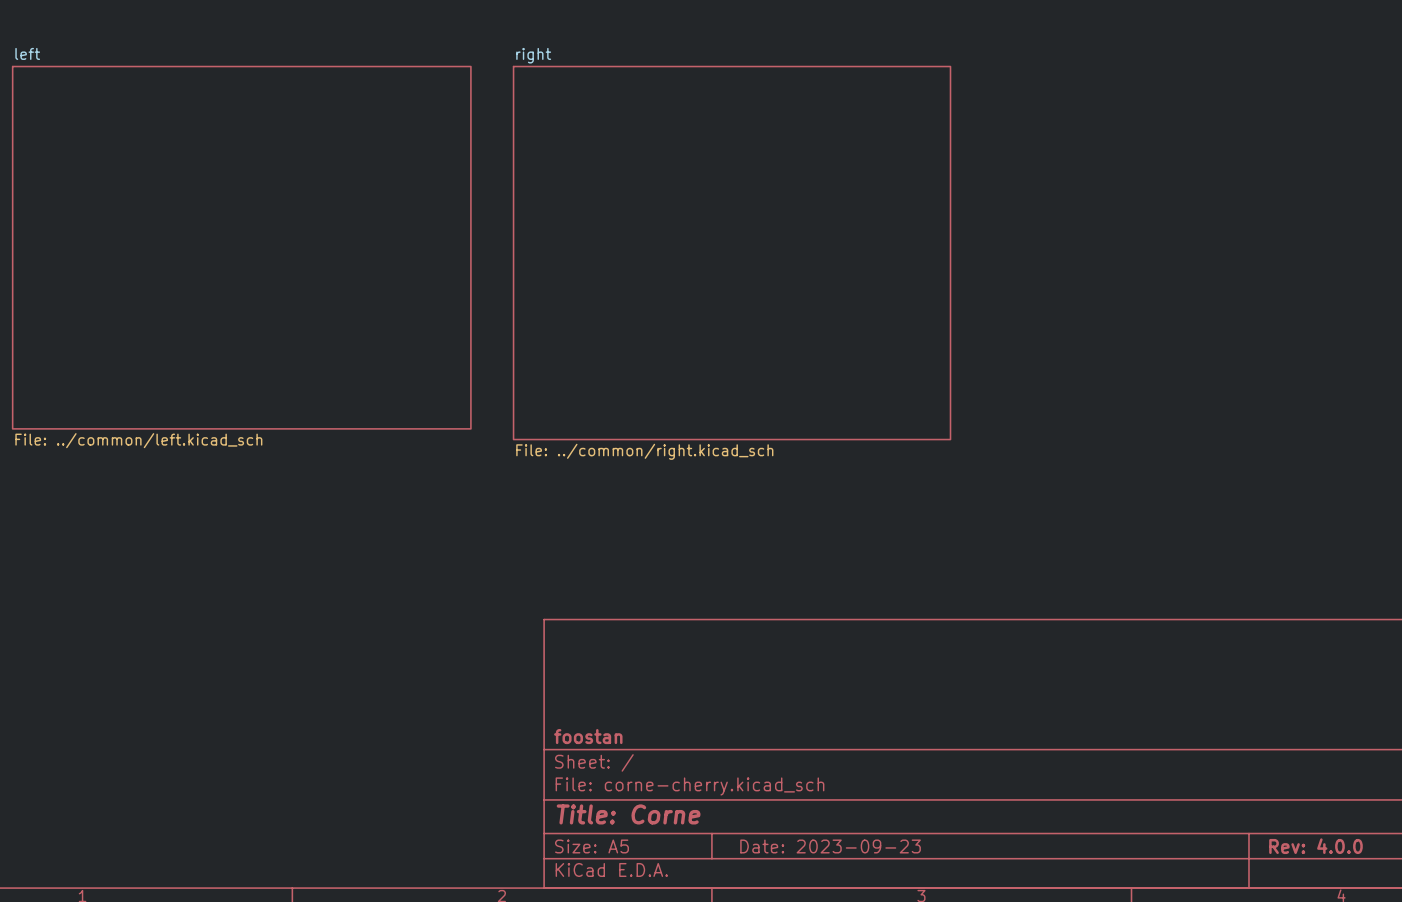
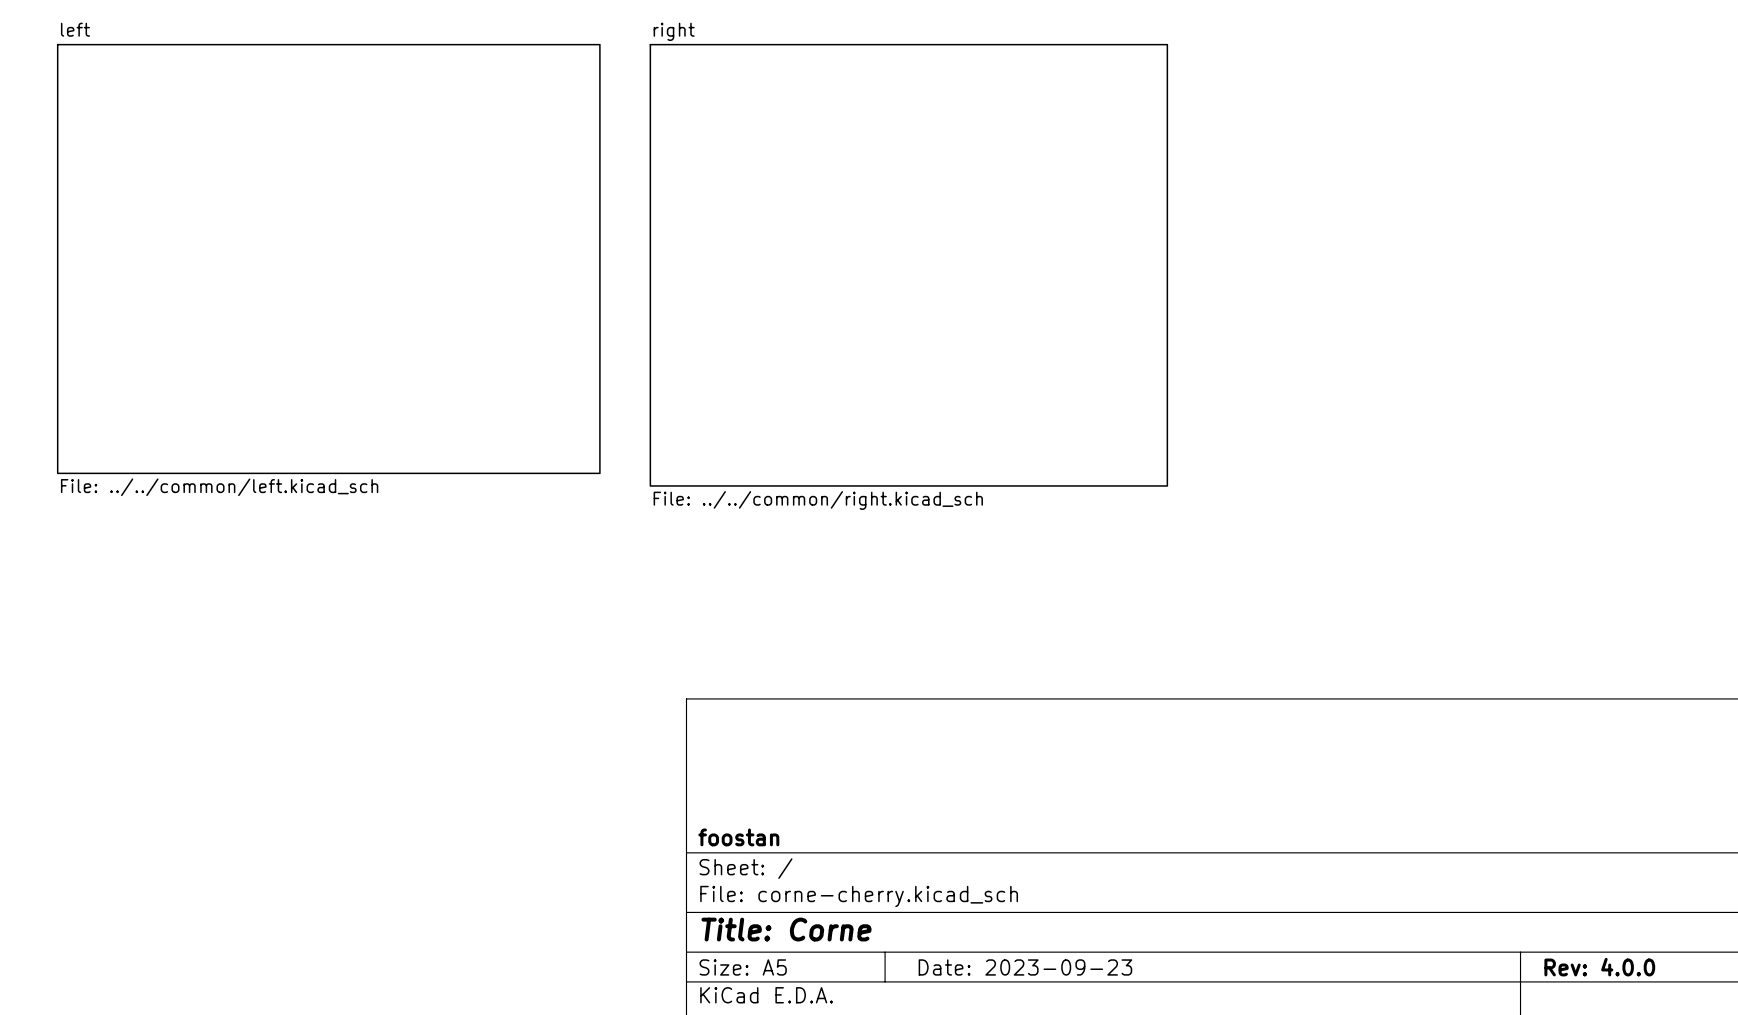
sheet left value: File: ../common/left.kicad_sch (138, 440) -> File: ../../common/left.kicad_sch (219, 487)
sheet right value: File: ../common/right.kicad_sch (644, 451) -> File: ../../common/right.kicad_sch (818, 500)

